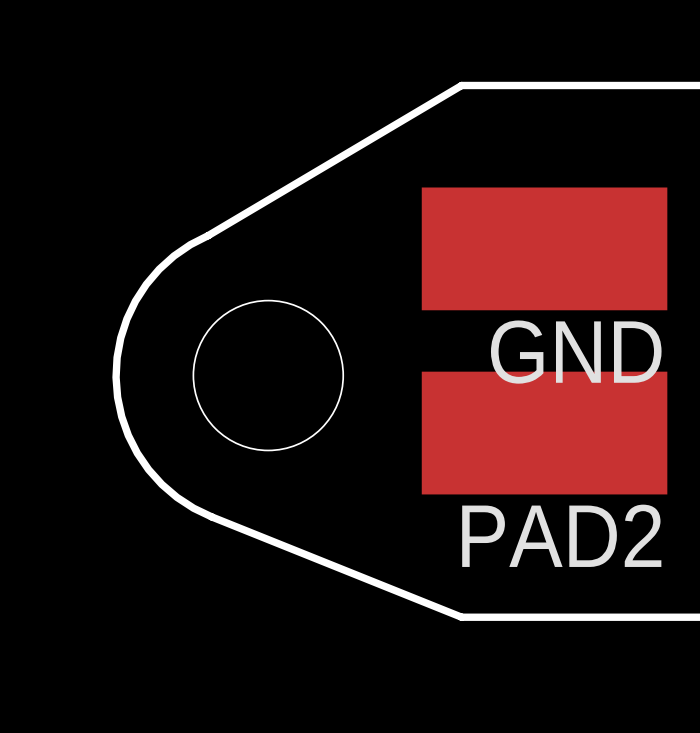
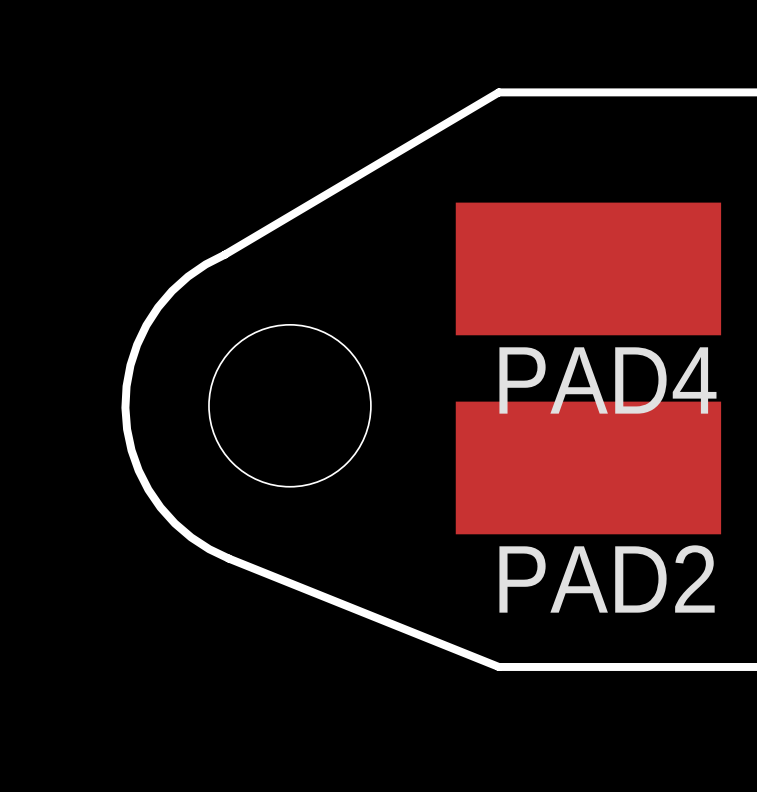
GND name: GND (576, 352) -> PAD4 (607, 380)

